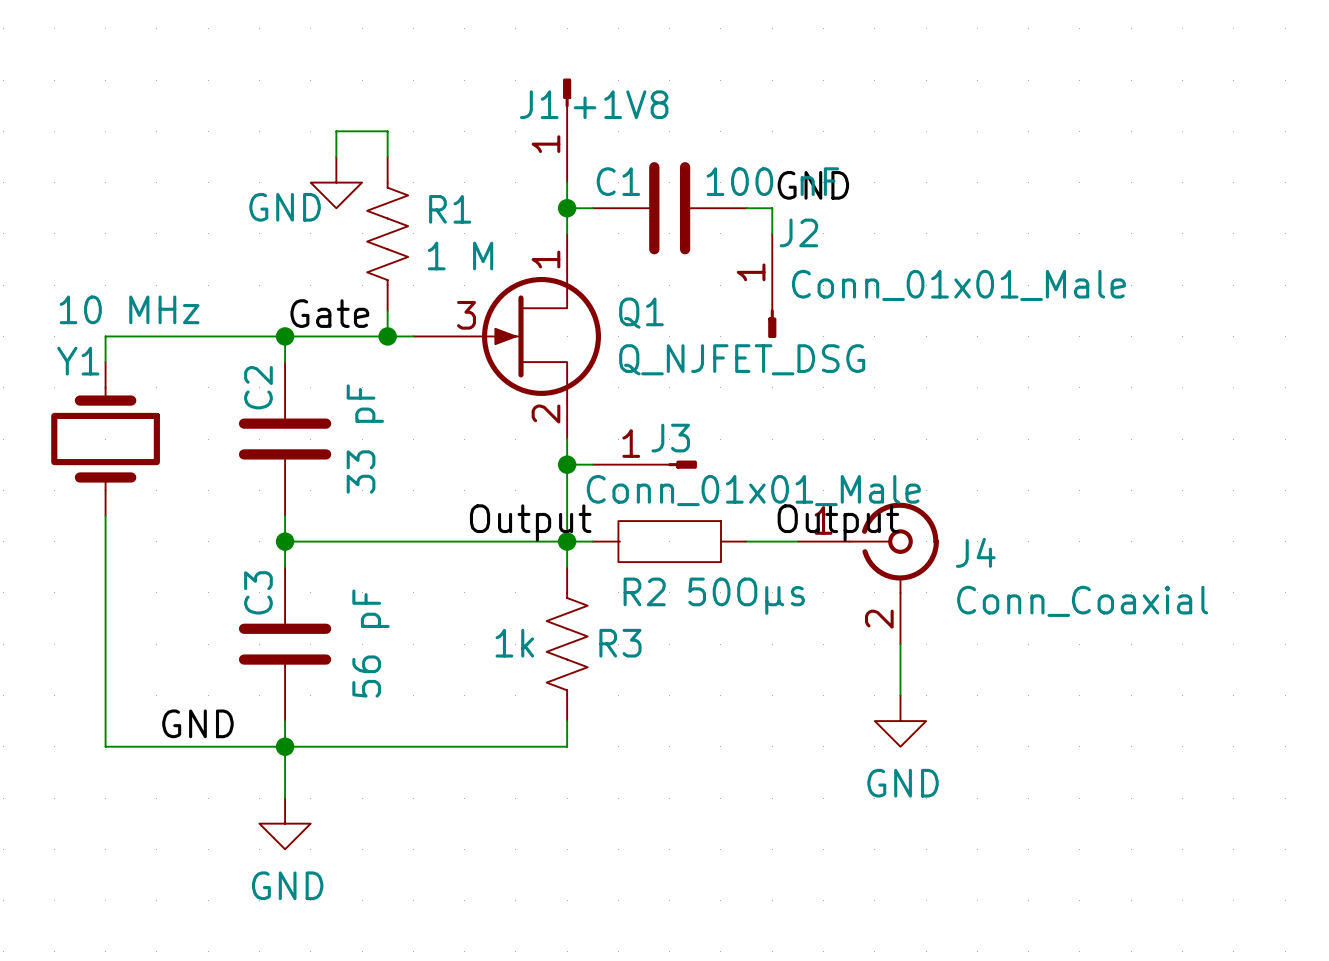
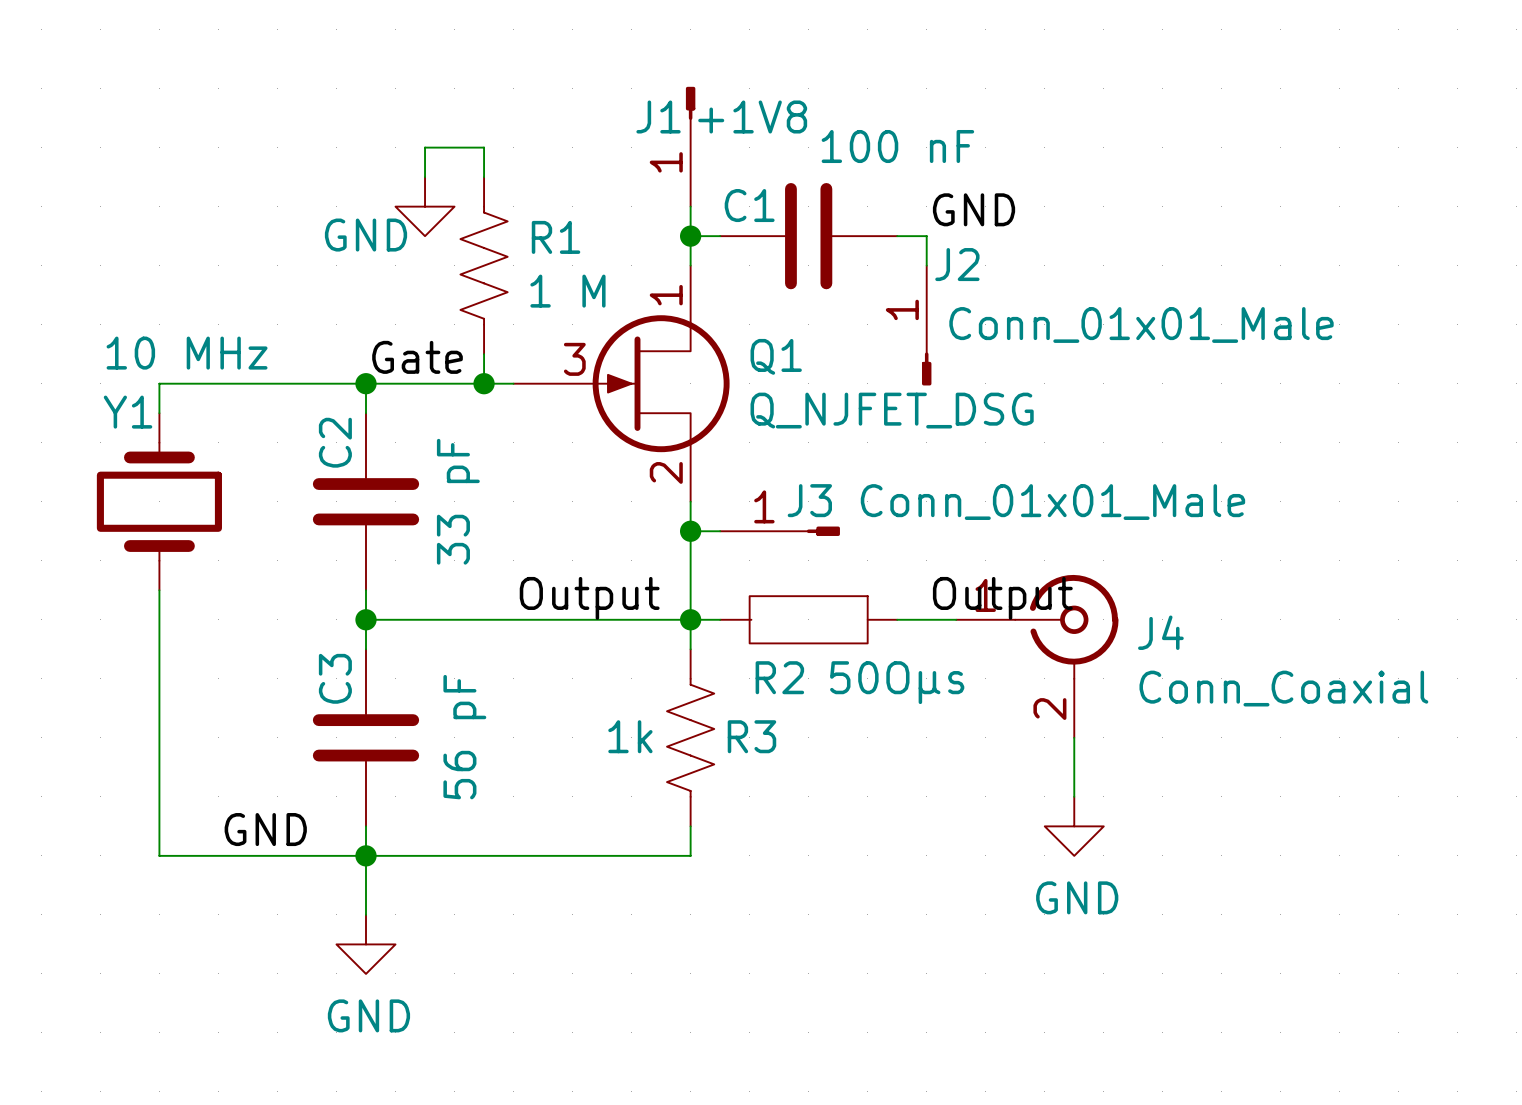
C1 value position: 100 nF (772, 181) -> 100 nF (897, 146)
J3 value position: Conn_01x01_Male (753, 490) -> Conn_01x01_Male (1052, 502)
label position: Output (530, 522) -> Output (589, 598)

